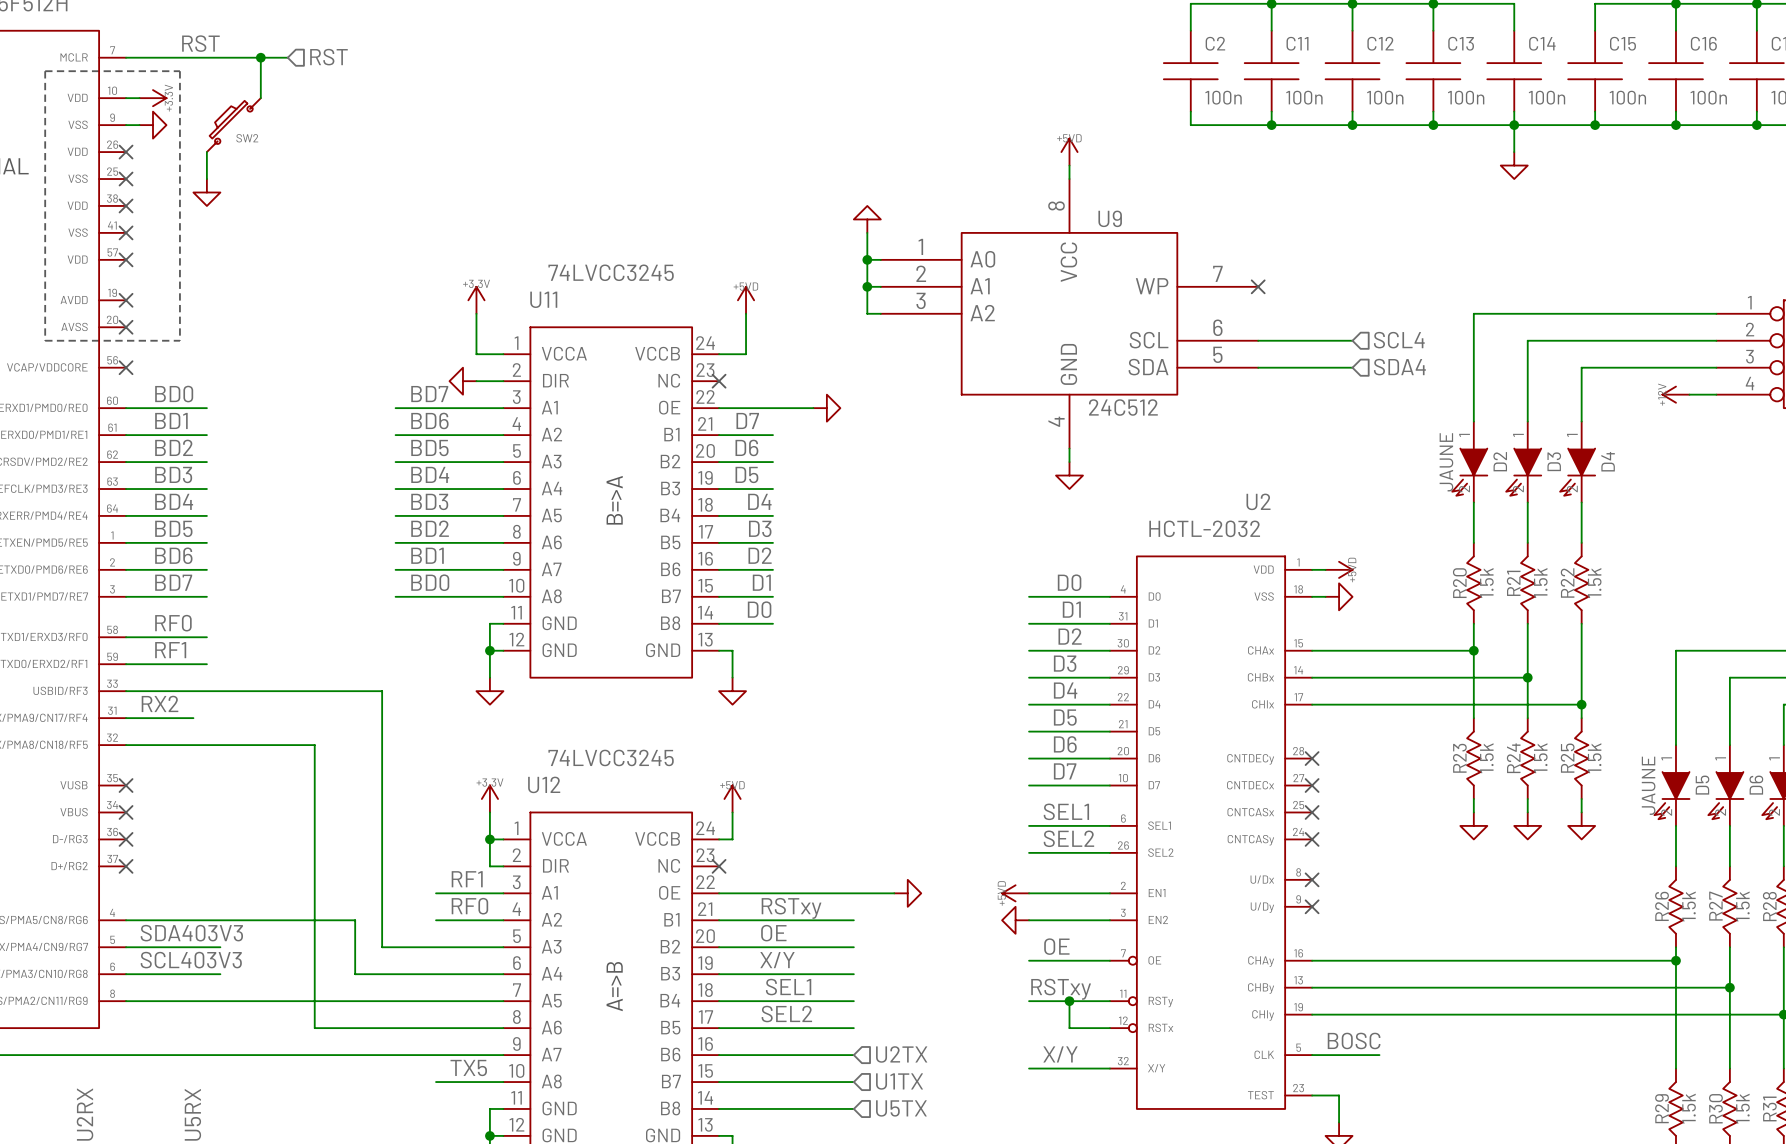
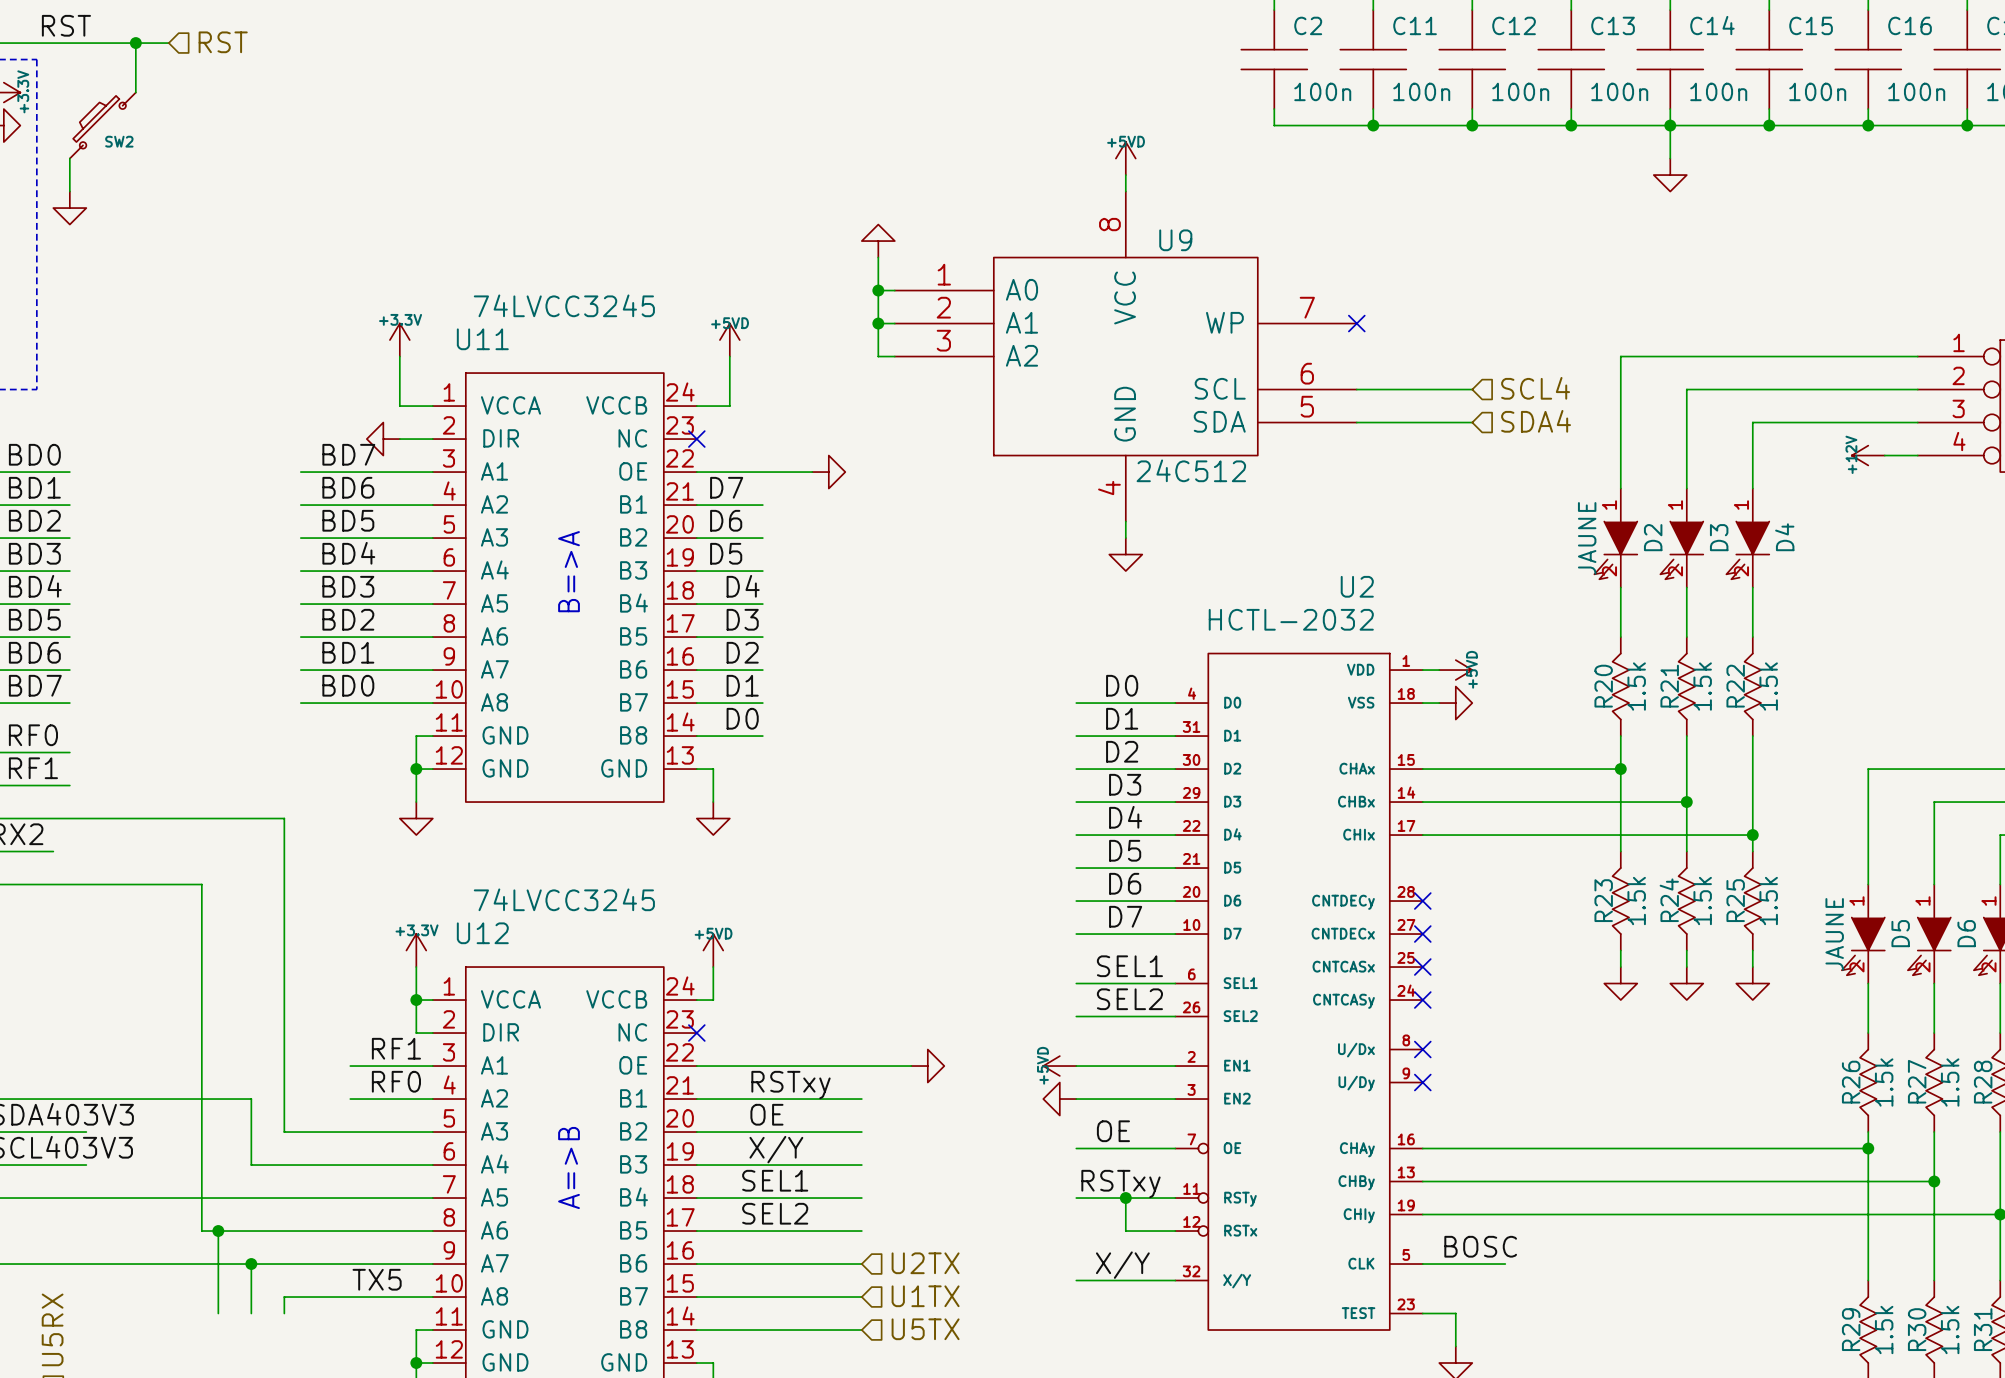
wire: none -> (218, 1231) (218, 1313)
junction: none -> (218, 1231)
wire: none -> (251, 1264) (251, 1313)
junction: none -> (251, 1264)
label position: TX5 (468, 1068) -> TX5 (377, 1279)
wire: none -> (350, 1297) (284, 1297) (284, 1313)

